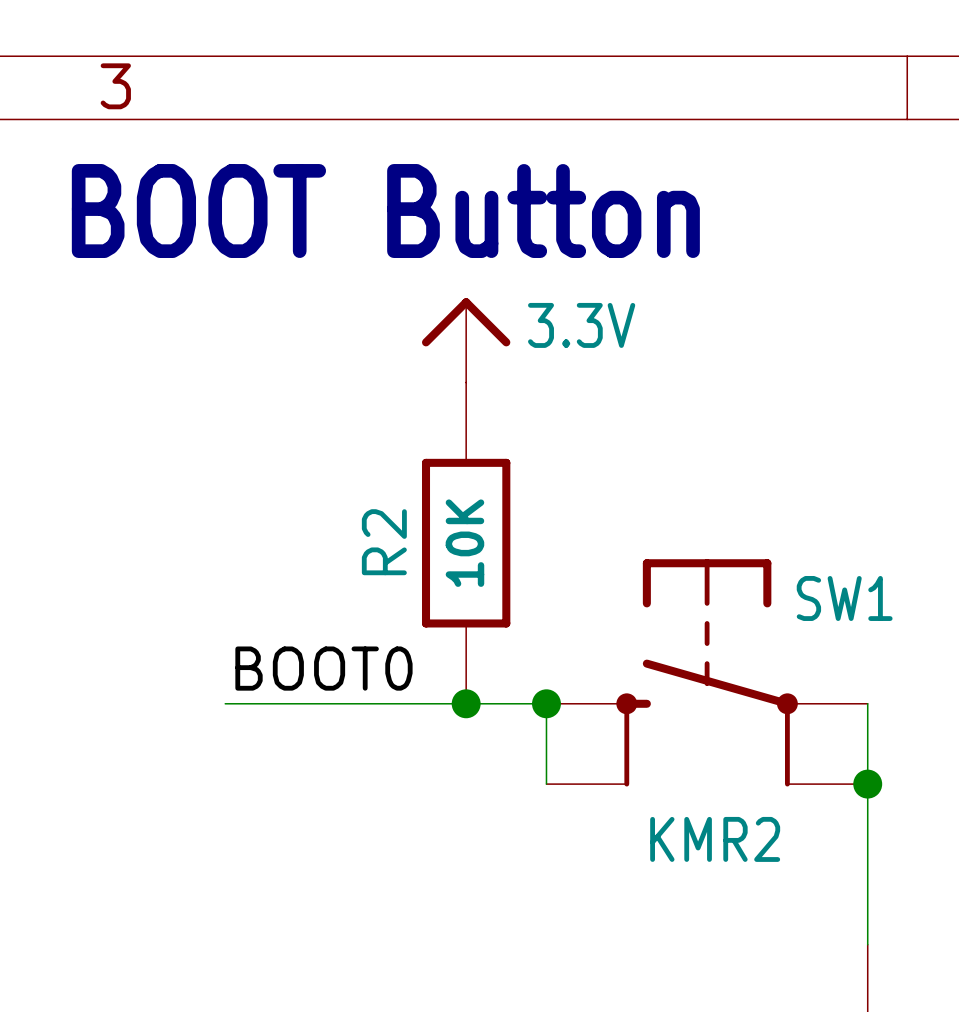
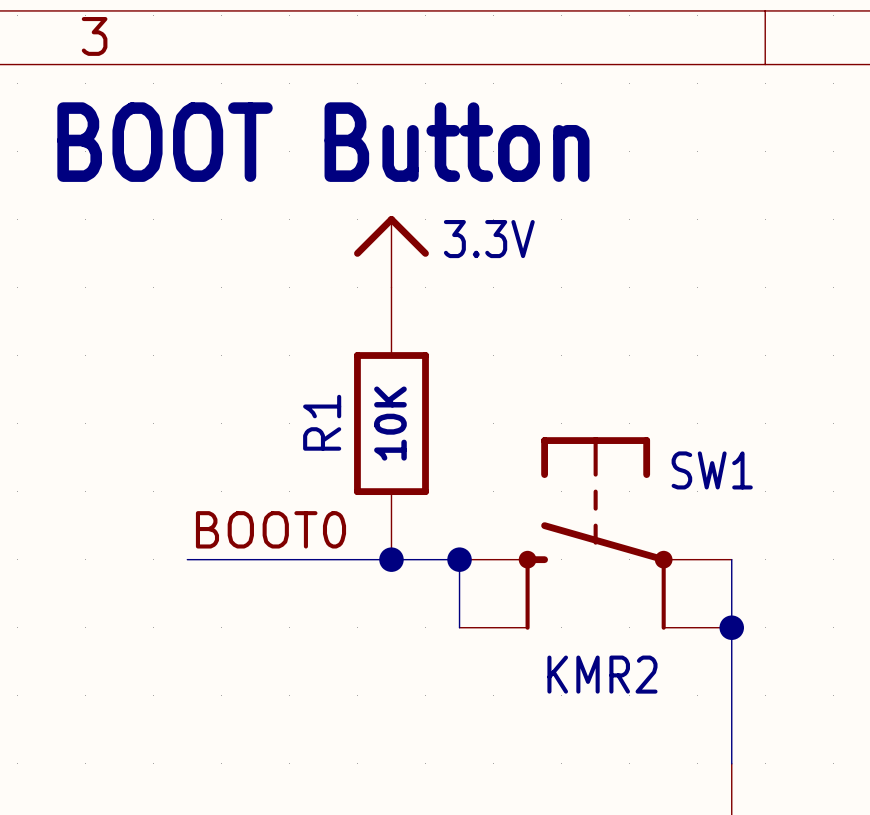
R2 name: R2 (384, 542) -> R1 (322, 422)

